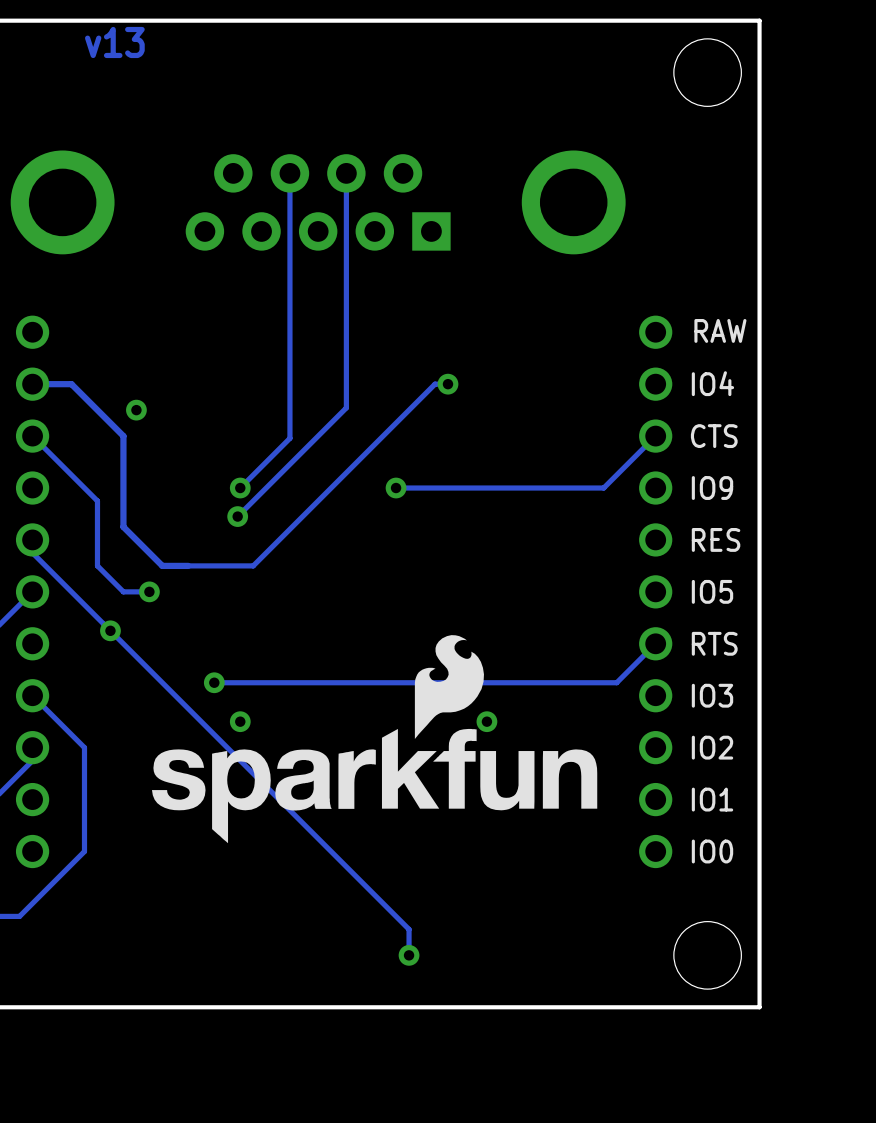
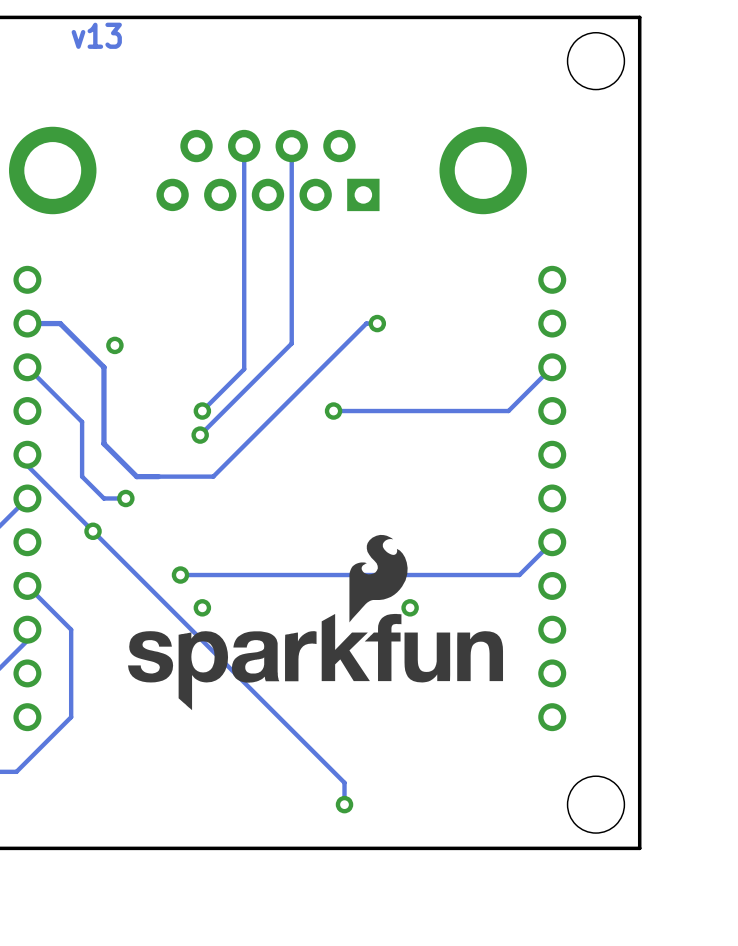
text: RAW (720, 330) -> none
text: IO4 (712, 383) -> none
text: CTS (714, 436) -> none
text: IO9 (712, 488) -> none
text: RES (716, 539) -> none
text: IO5 (712, 591) -> none
text: RTS (714, 643) -> none
text: IO3 (712, 695) -> none
text: IO2 (712, 747) -> none
text: IO1 (712, 799) -> none
text: IO0 (712, 851) -> none

